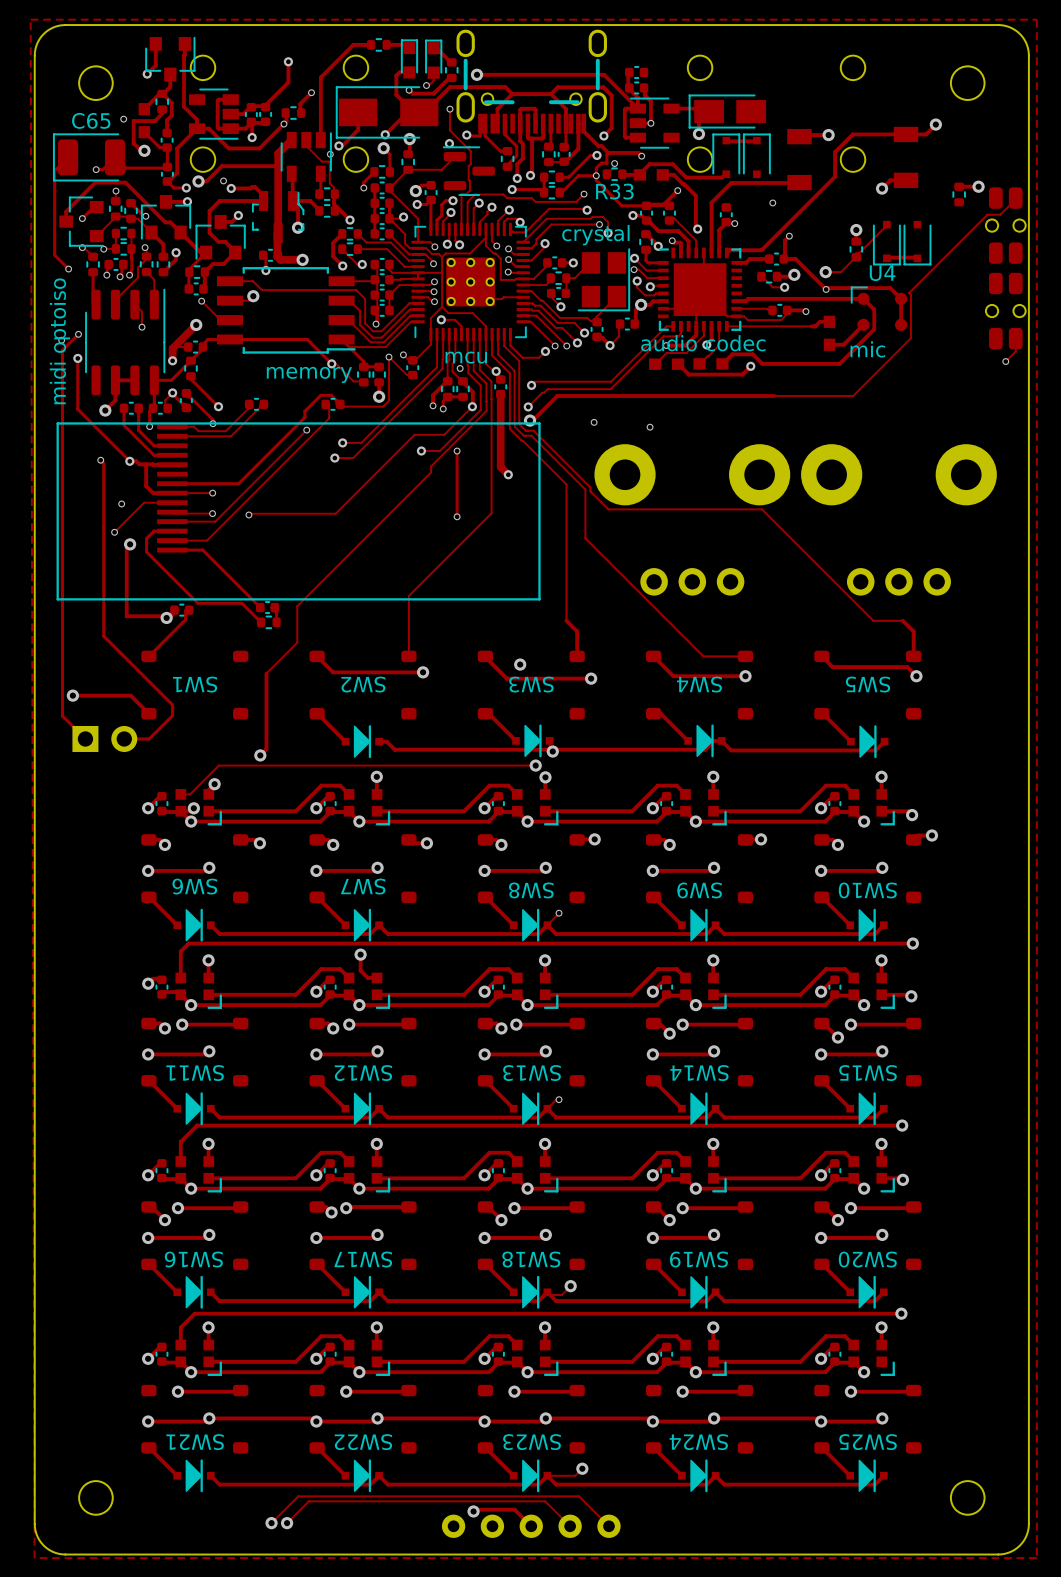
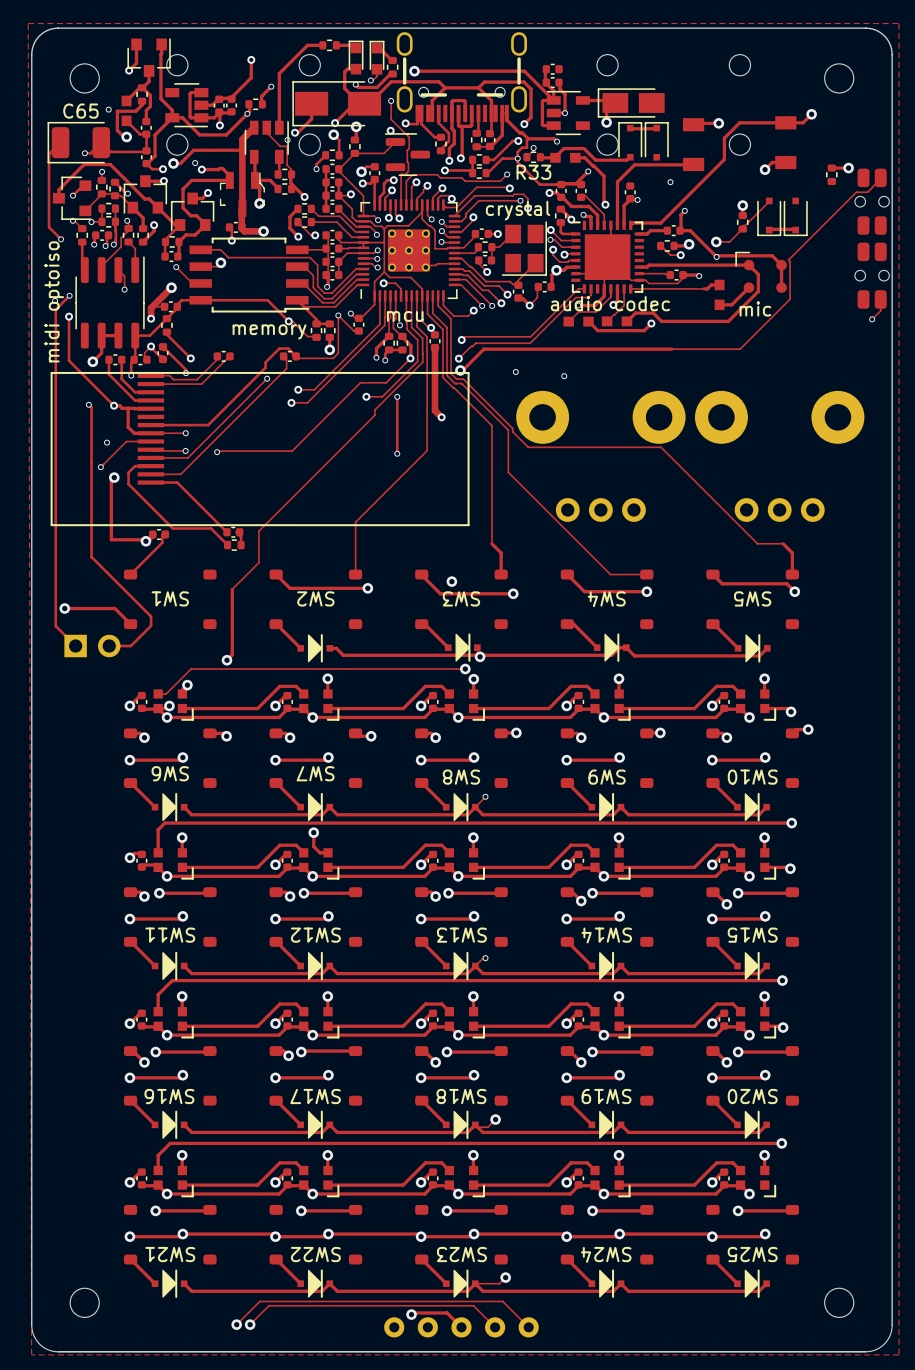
line: (867, 287) (851, 287) (851, 302) -> none
part: none -> (761, 272)
U4: (882, 311) -> none

